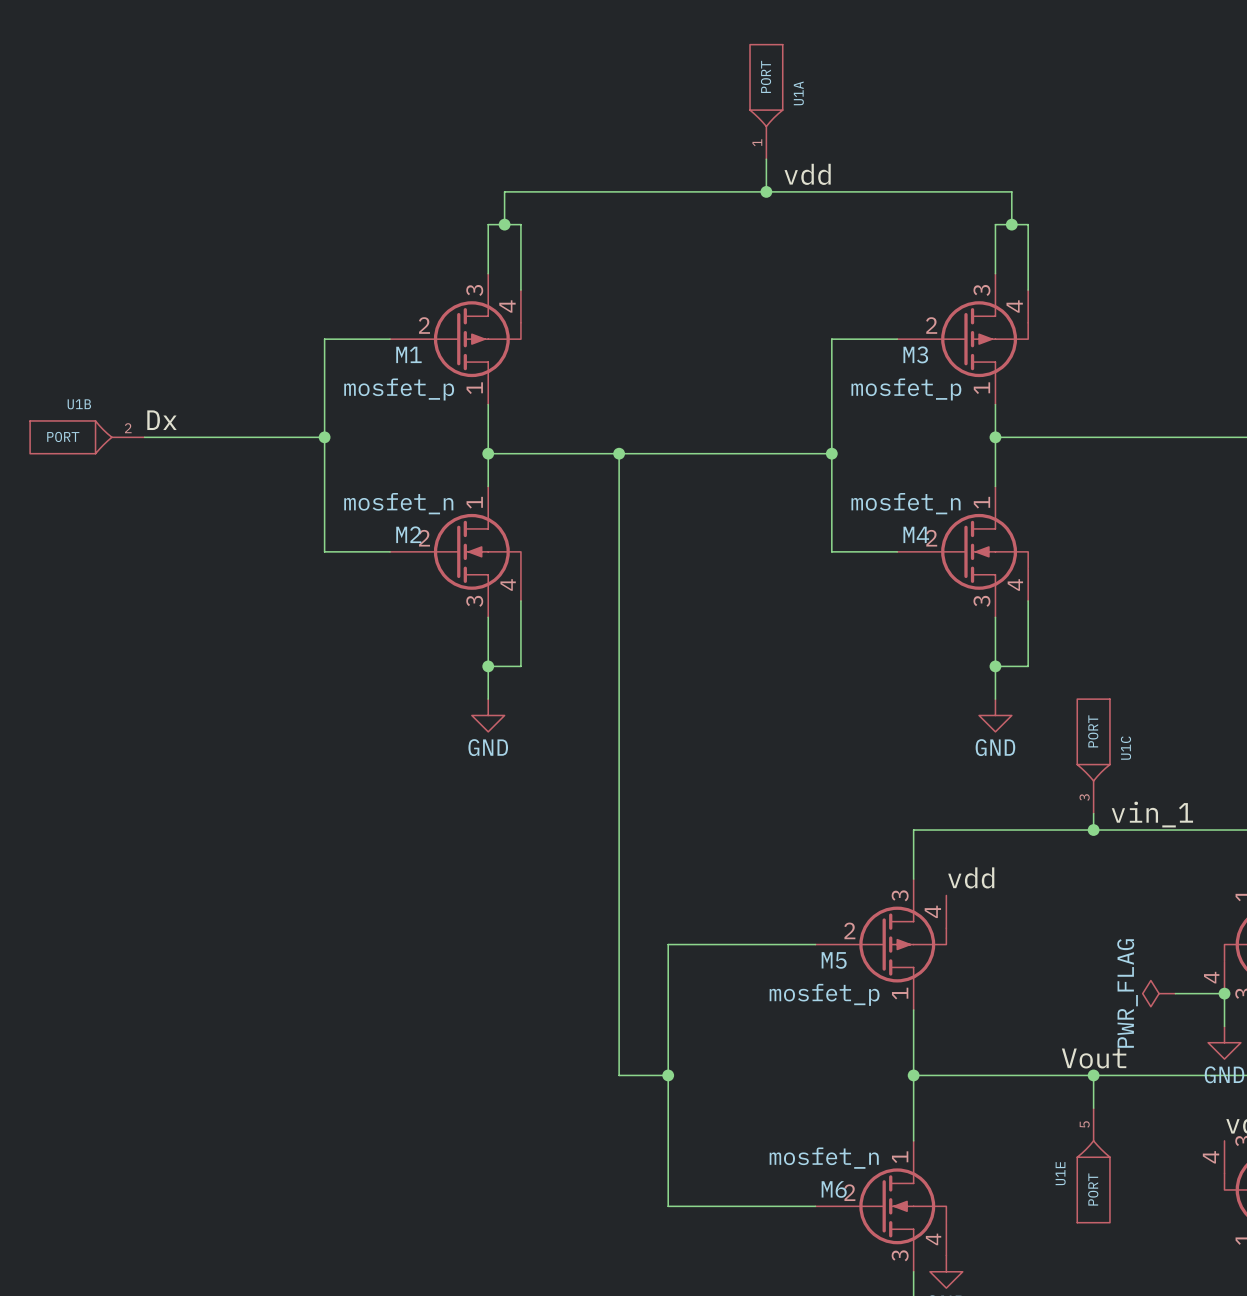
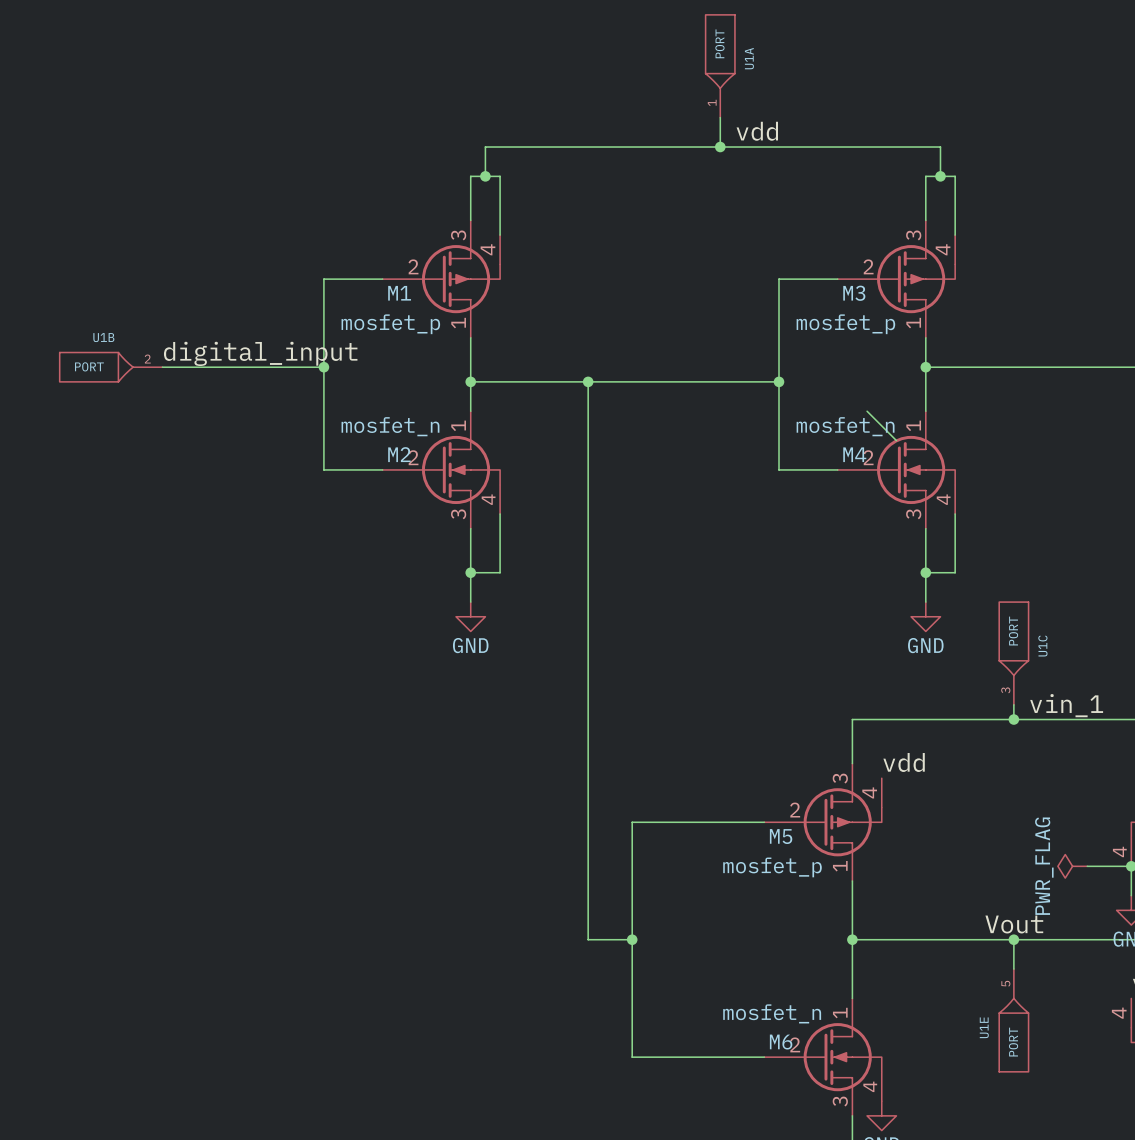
label: Dx (162, 420) -> digital_input (260, 353)
wire: none -> (867, 411) (896, 440)

